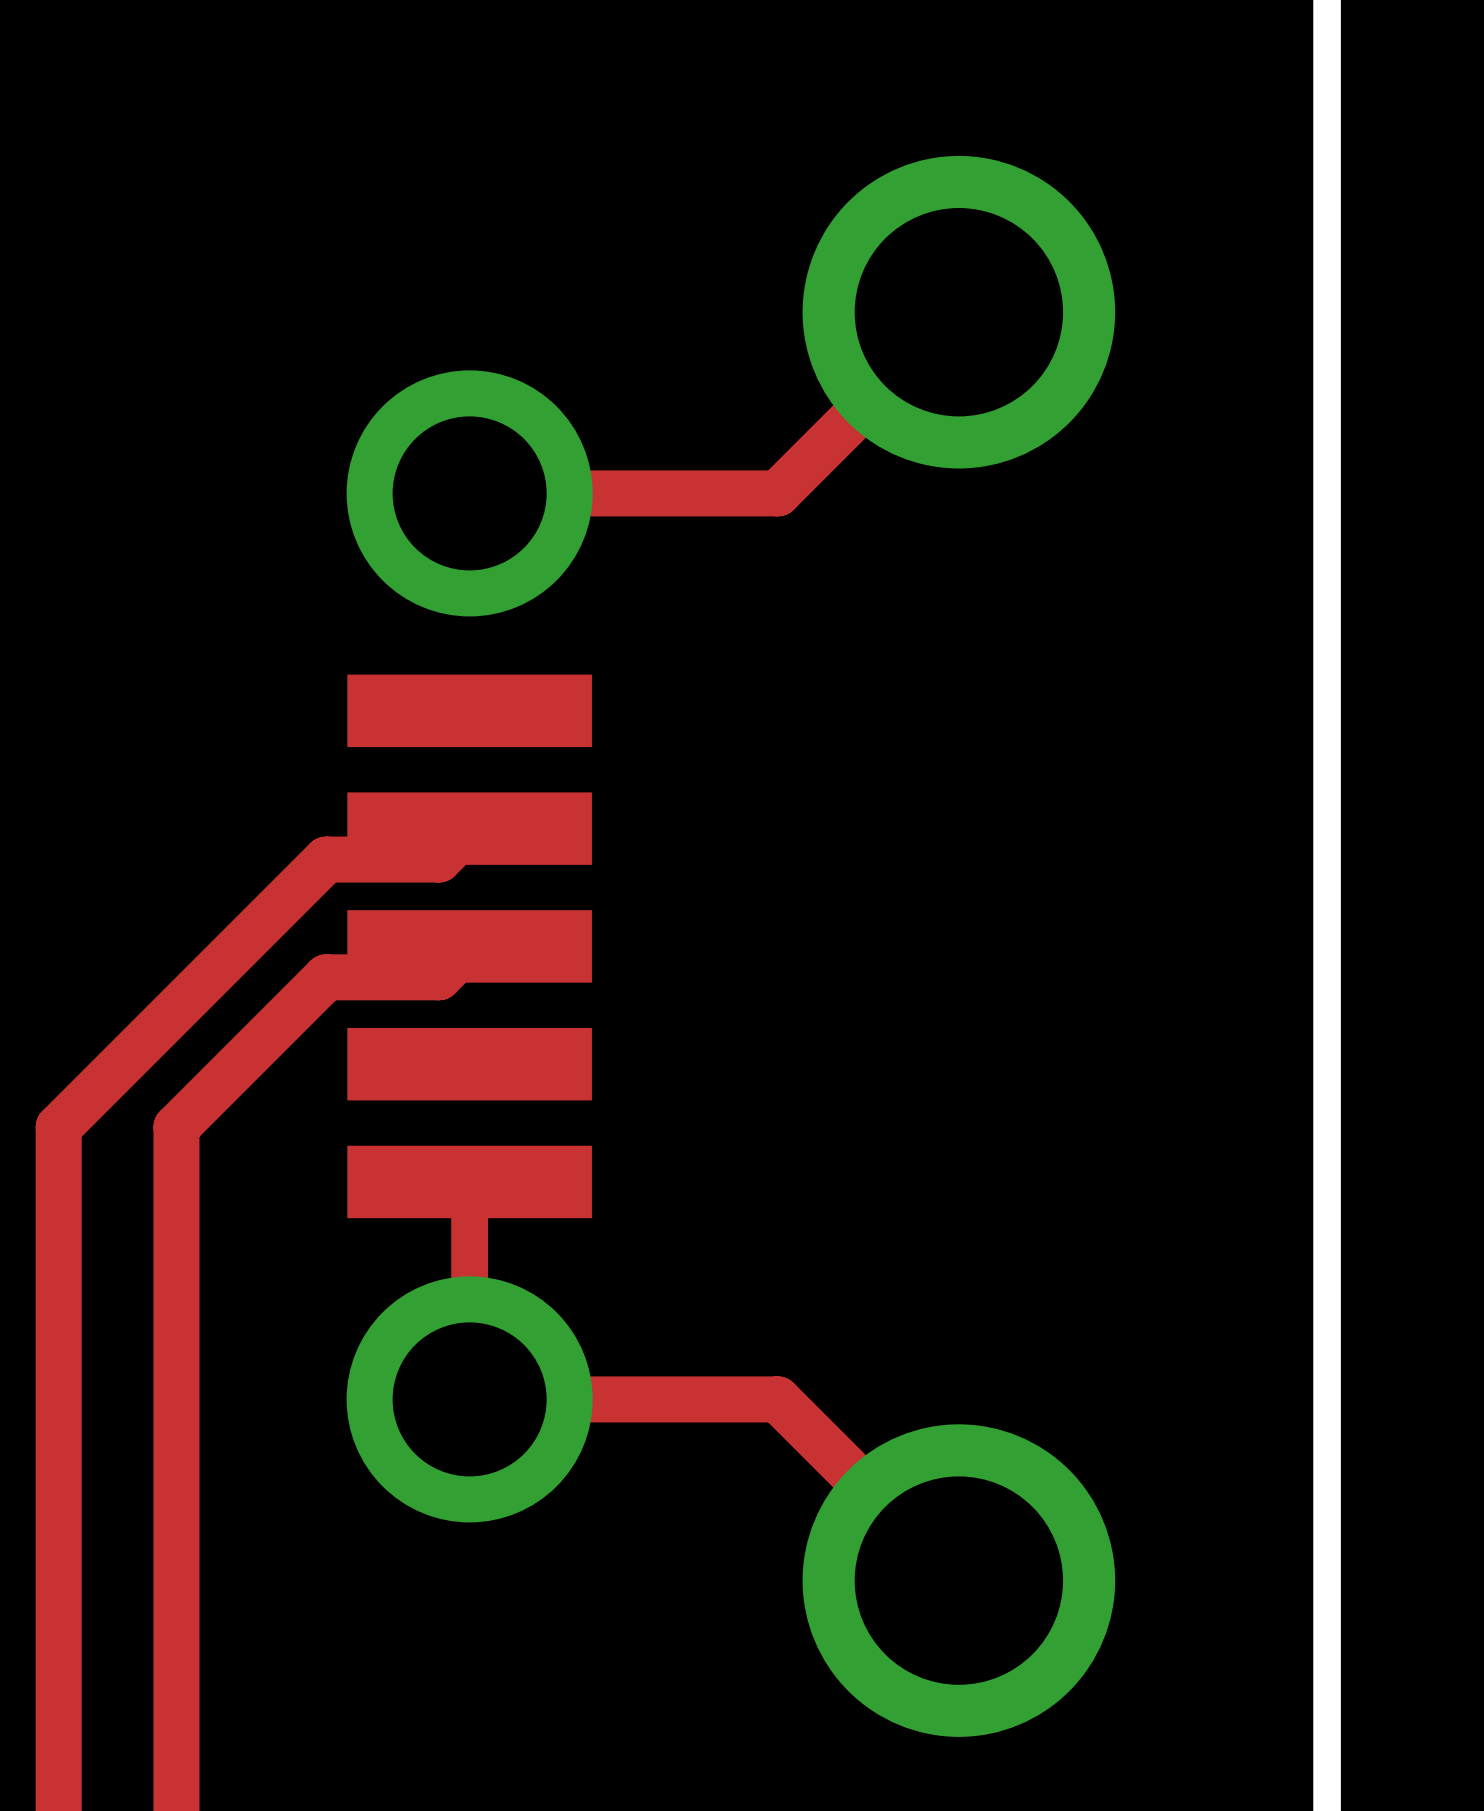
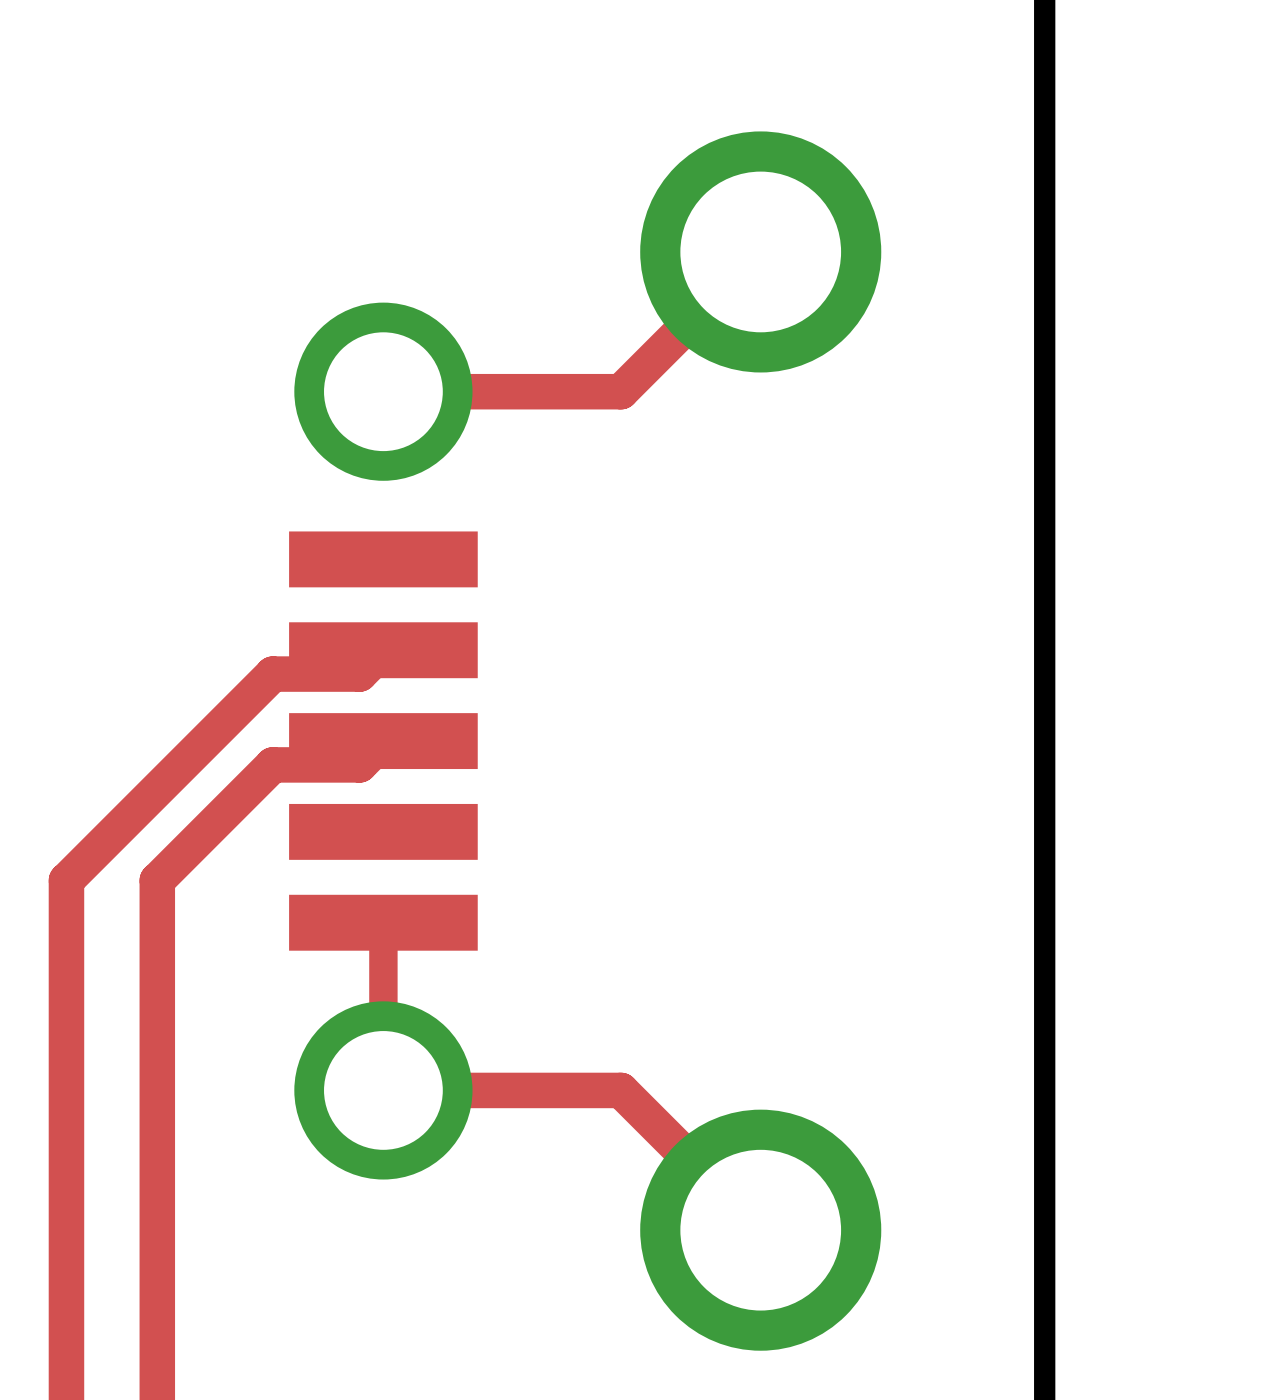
part footprint: [346, 155, 1116, 1737] -> [289, 131, 882, 1351]

